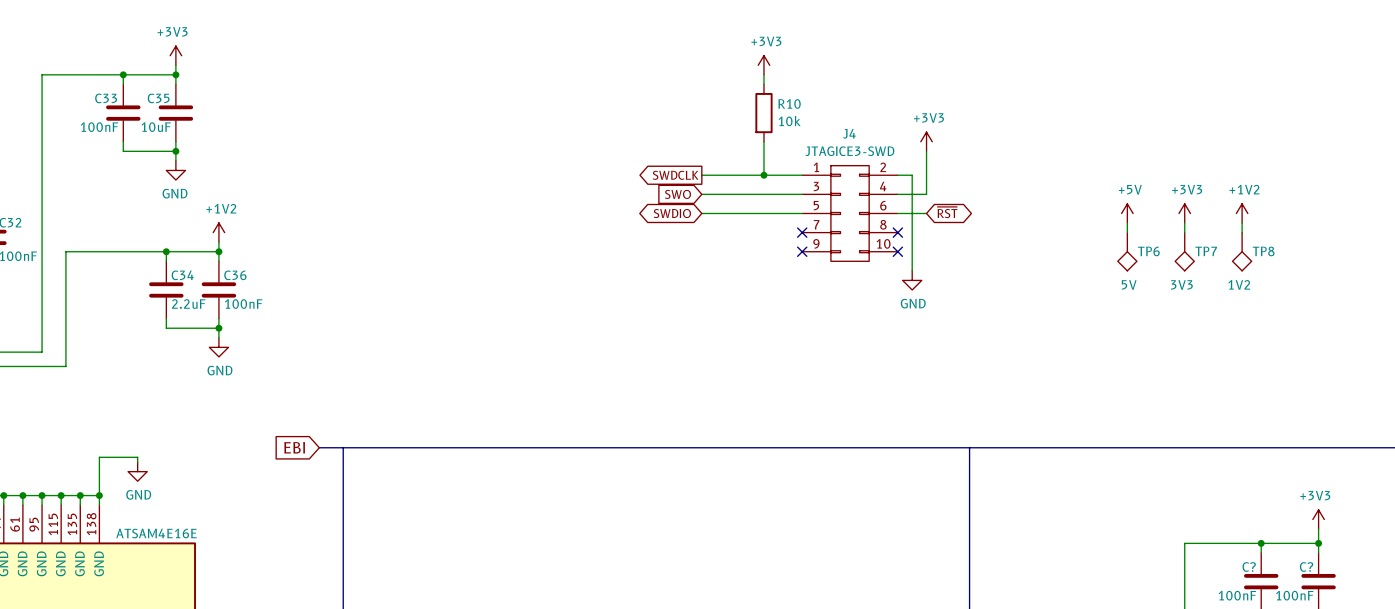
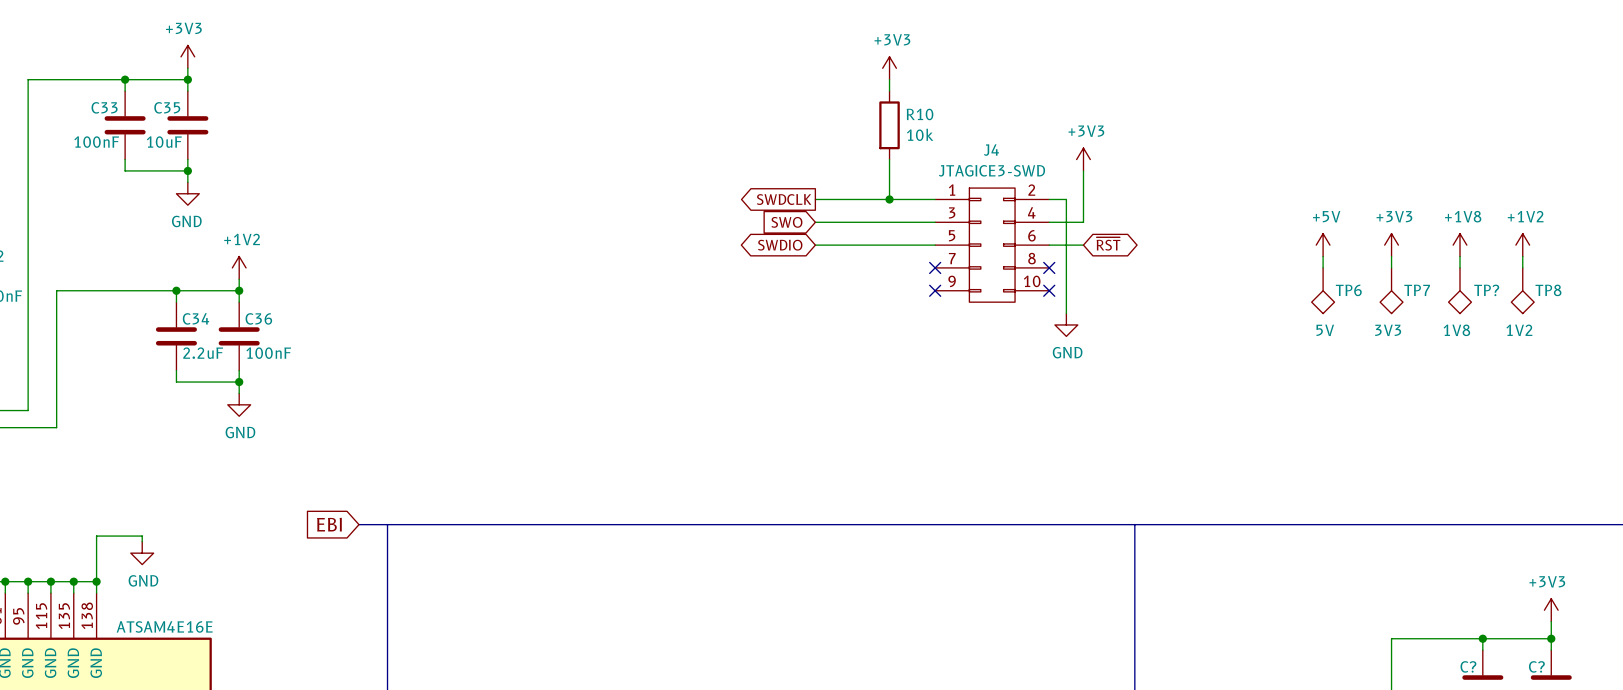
power symbol: +1V2 (1242, 213) -> +1V8 (1460, 245)
power symbol: none -> +1V2 (1522, 245)
wire: none -> (1522, 256) (1522, 267)
TP8 name: TP8 (1263, 251) -> TP? (1486, 290)
TP8: none -> 1V2 (1522, 290)
TP8 value: 1V2 (1239, 284) -> 1V8 (1456, 330)

